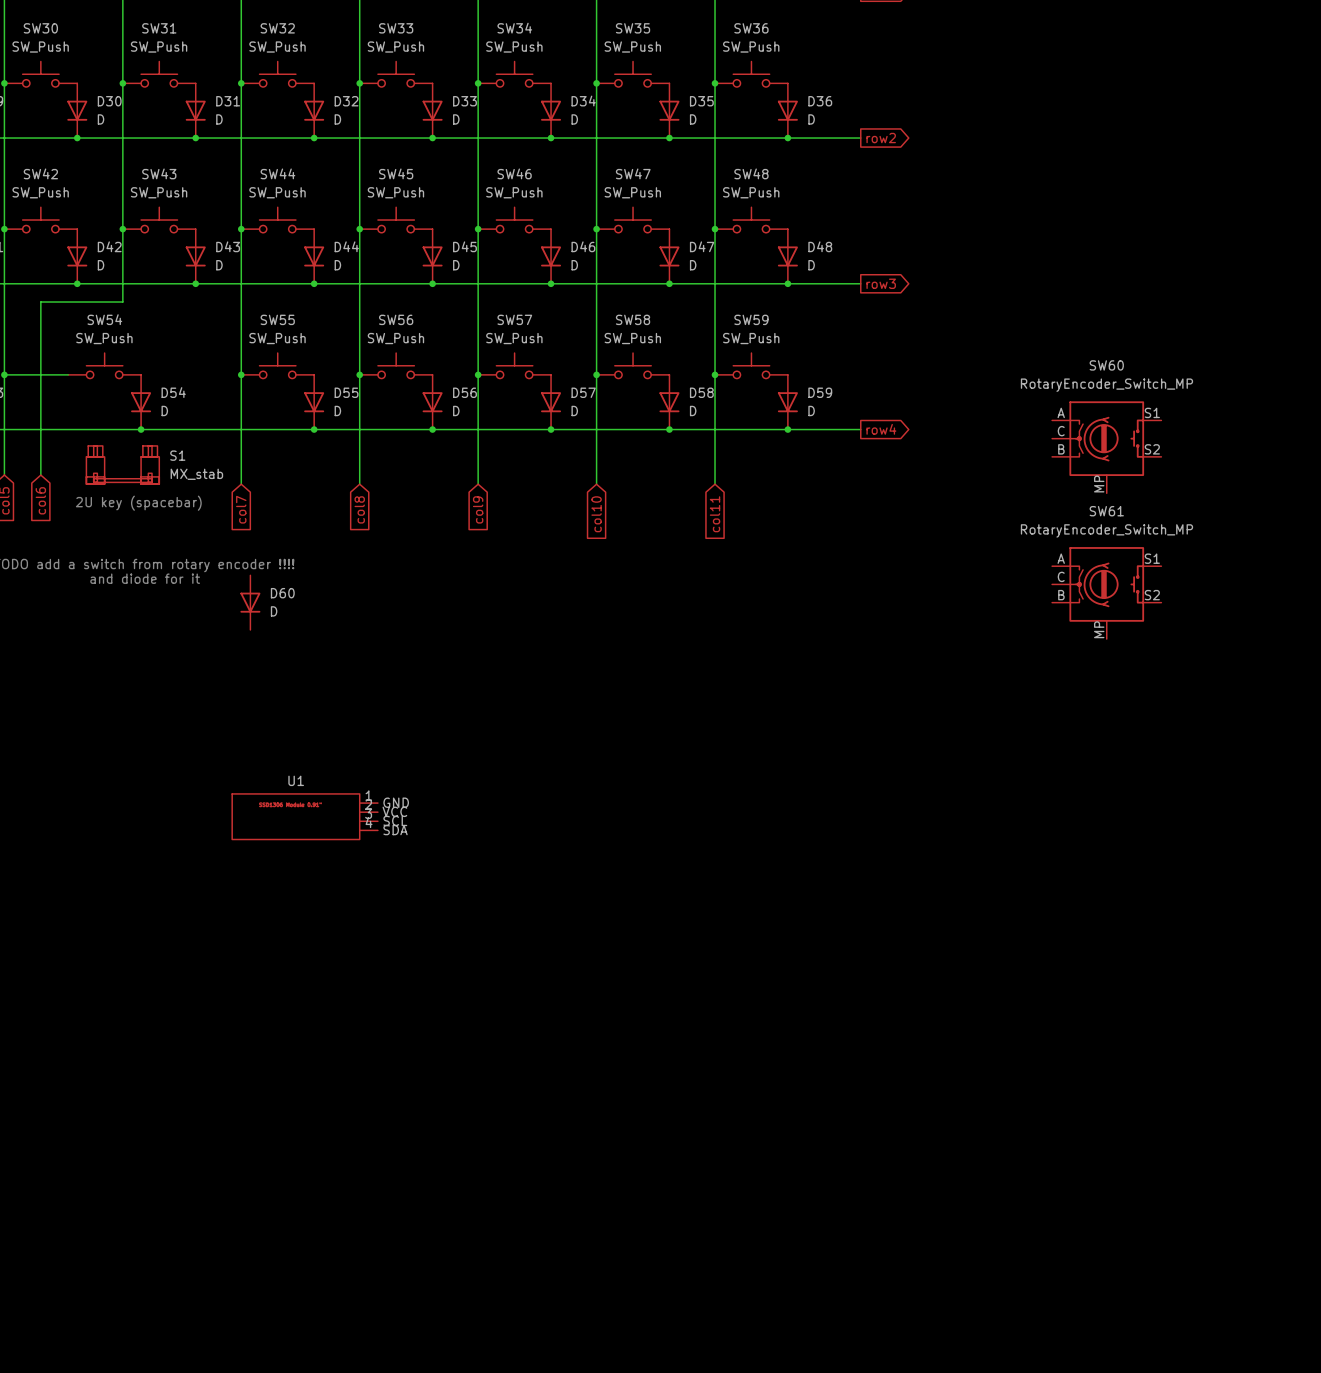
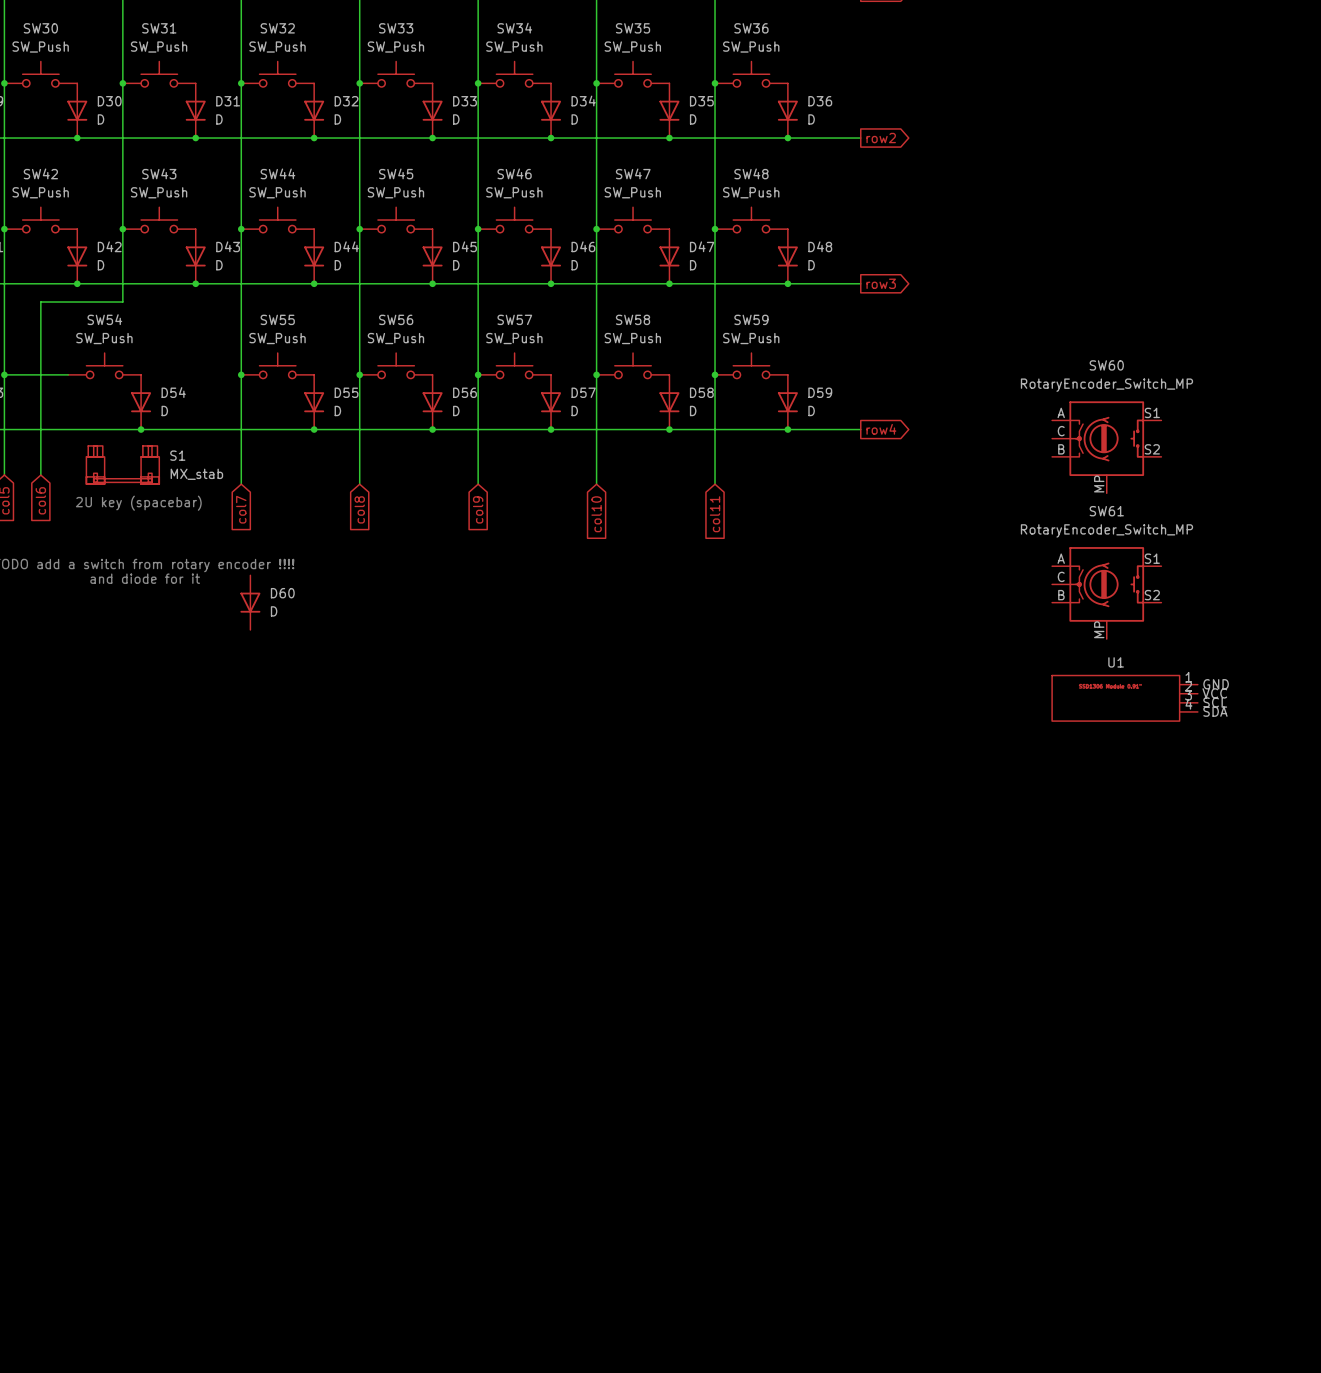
U1 position: (305, 816) -> (1124, 698)

